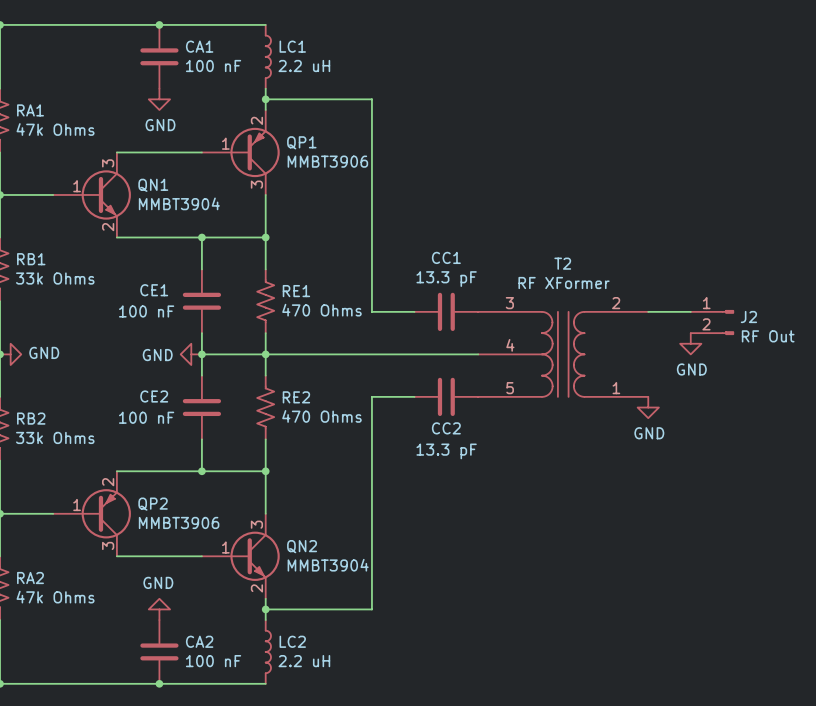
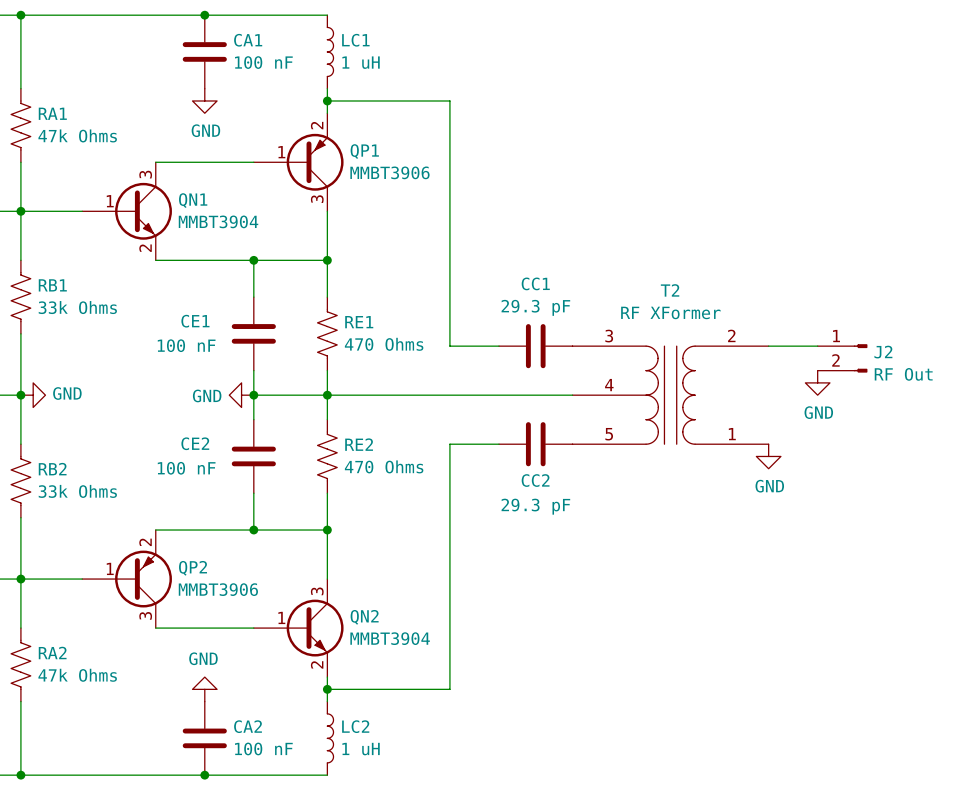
LC1 value: 2.2 uH (304, 66) -> 1 uH (361, 62)
CC1 value: 13.3 pF (446, 279) -> 29.3 pF (535, 307)
CC2 value: 13.3 pF (446, 451) -> 29.3 pF (535, 506)
LC2 value: 2.2 uH (304, 661) -> 1 uH (361, 749)

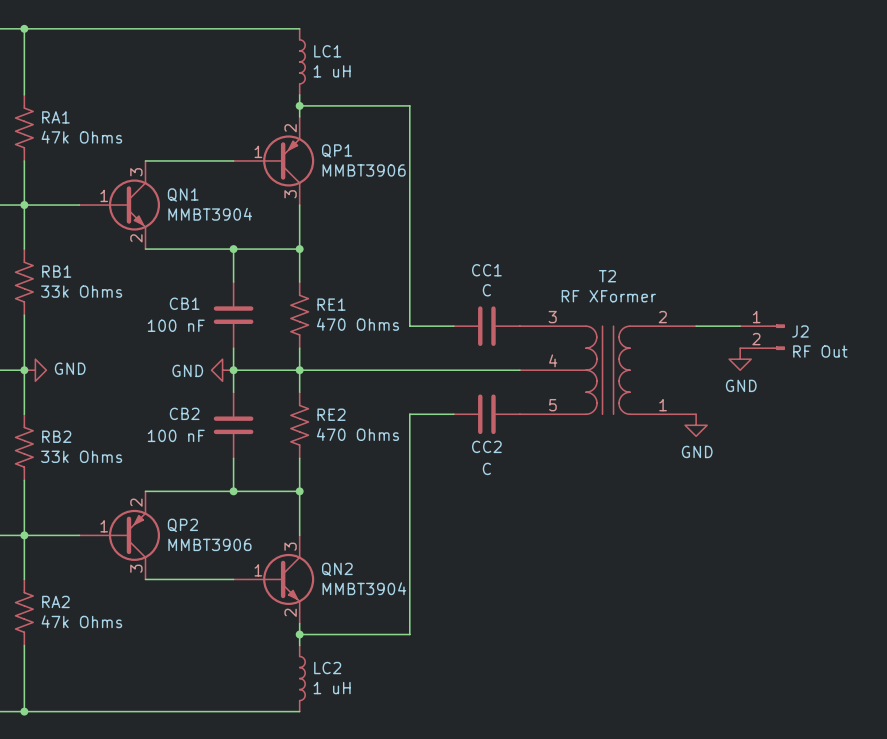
junction: (204, 15) -> none
CA1: 100 nF (204, 51) -> none
power symbol: GND (204, 100) -> none
CC1 value: 29.3 pF (535, 307) -> C (486, 290)
CE1 name: CE1 (195, 321) -> CB1 (184, 303)
CE2 name: CE2 (195, 443) -> CB2 (184, 413)
CC2 value: 29.3 pF (535, 506) -> C (486, 468)
power symbol: GND (204, 689) -> none
CA2: 100 nF (204, 738) -> none
junction: (204, 775) -> none

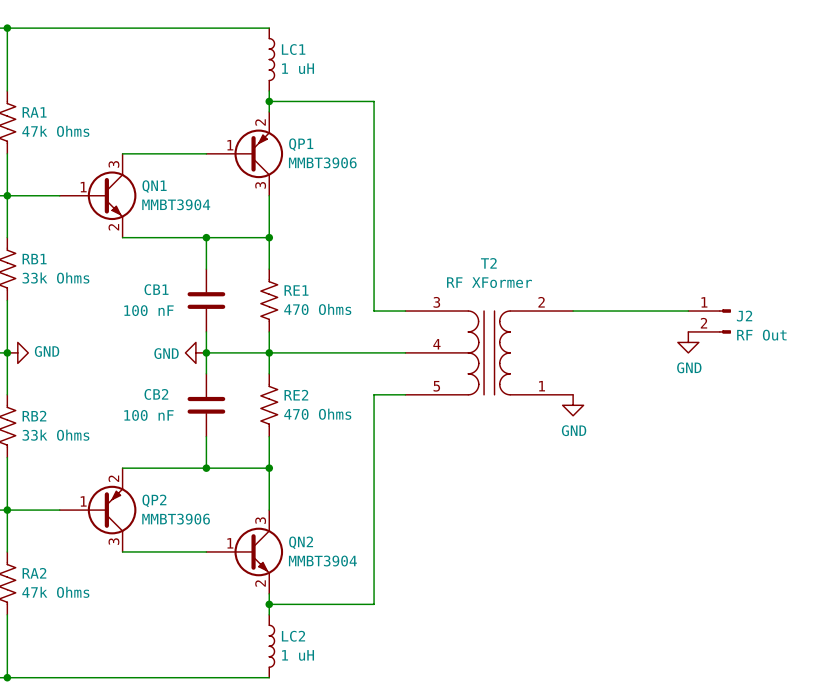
CC1: C (486, 326) -> none
T2 position: (608, 370) -> (489, 352)
CC2: C (486, 414) -> none
power symbol position: GND (696, 425) -> GND (573, 405)

